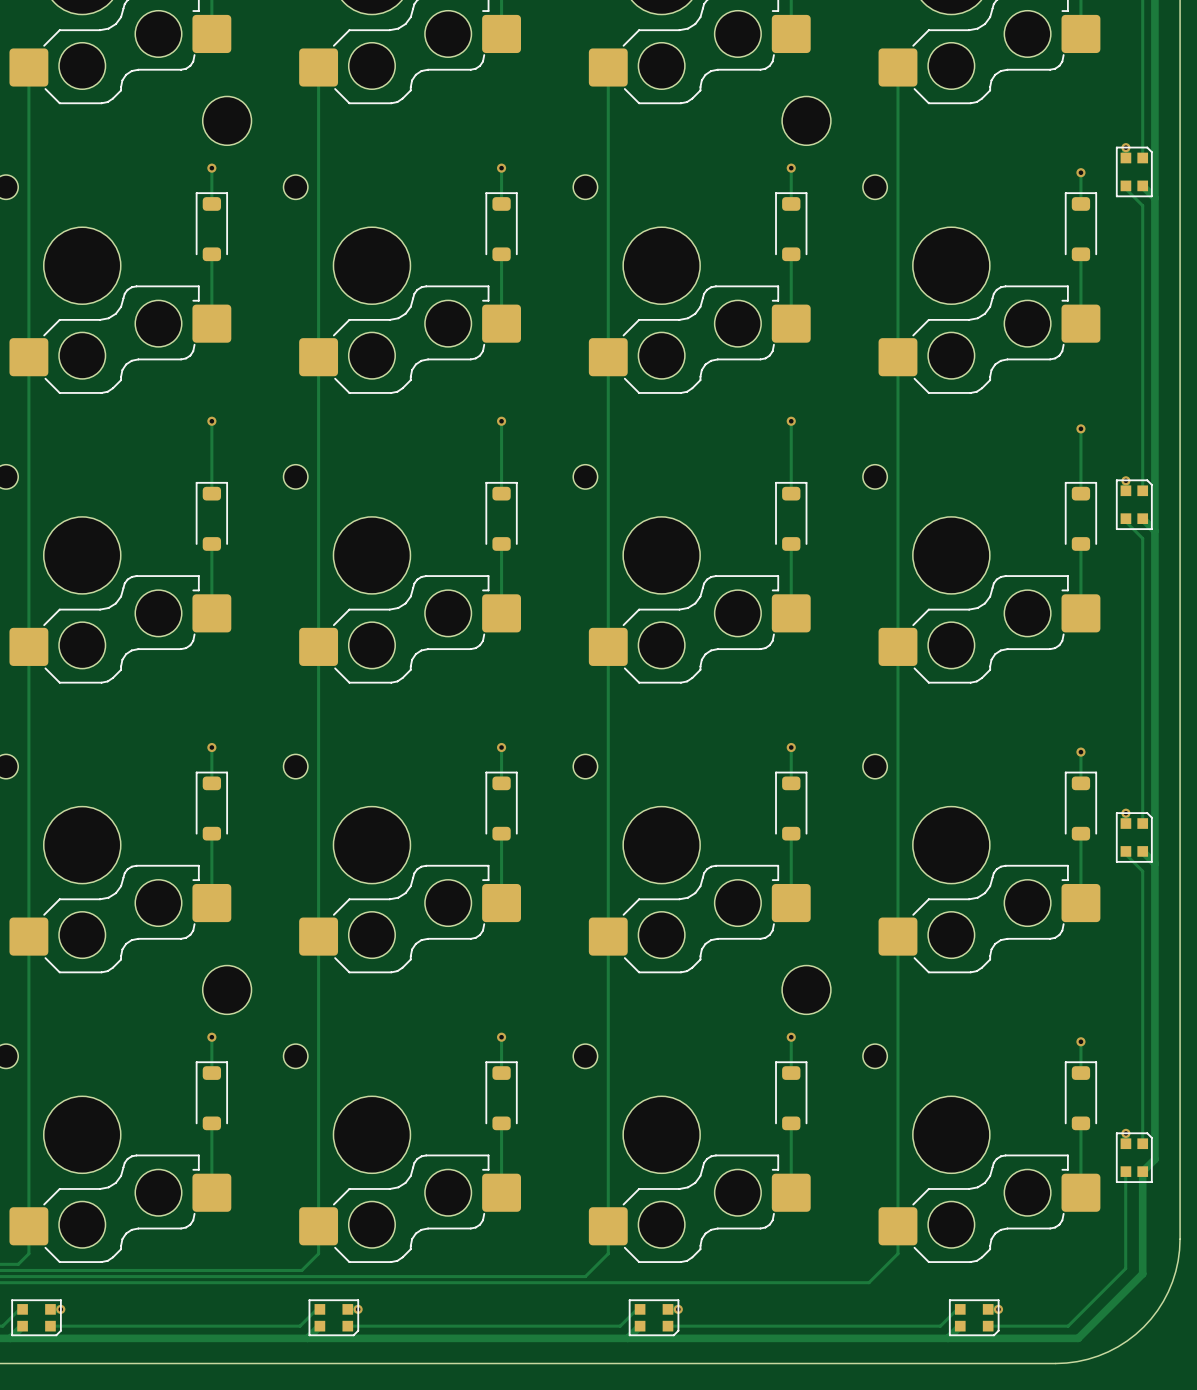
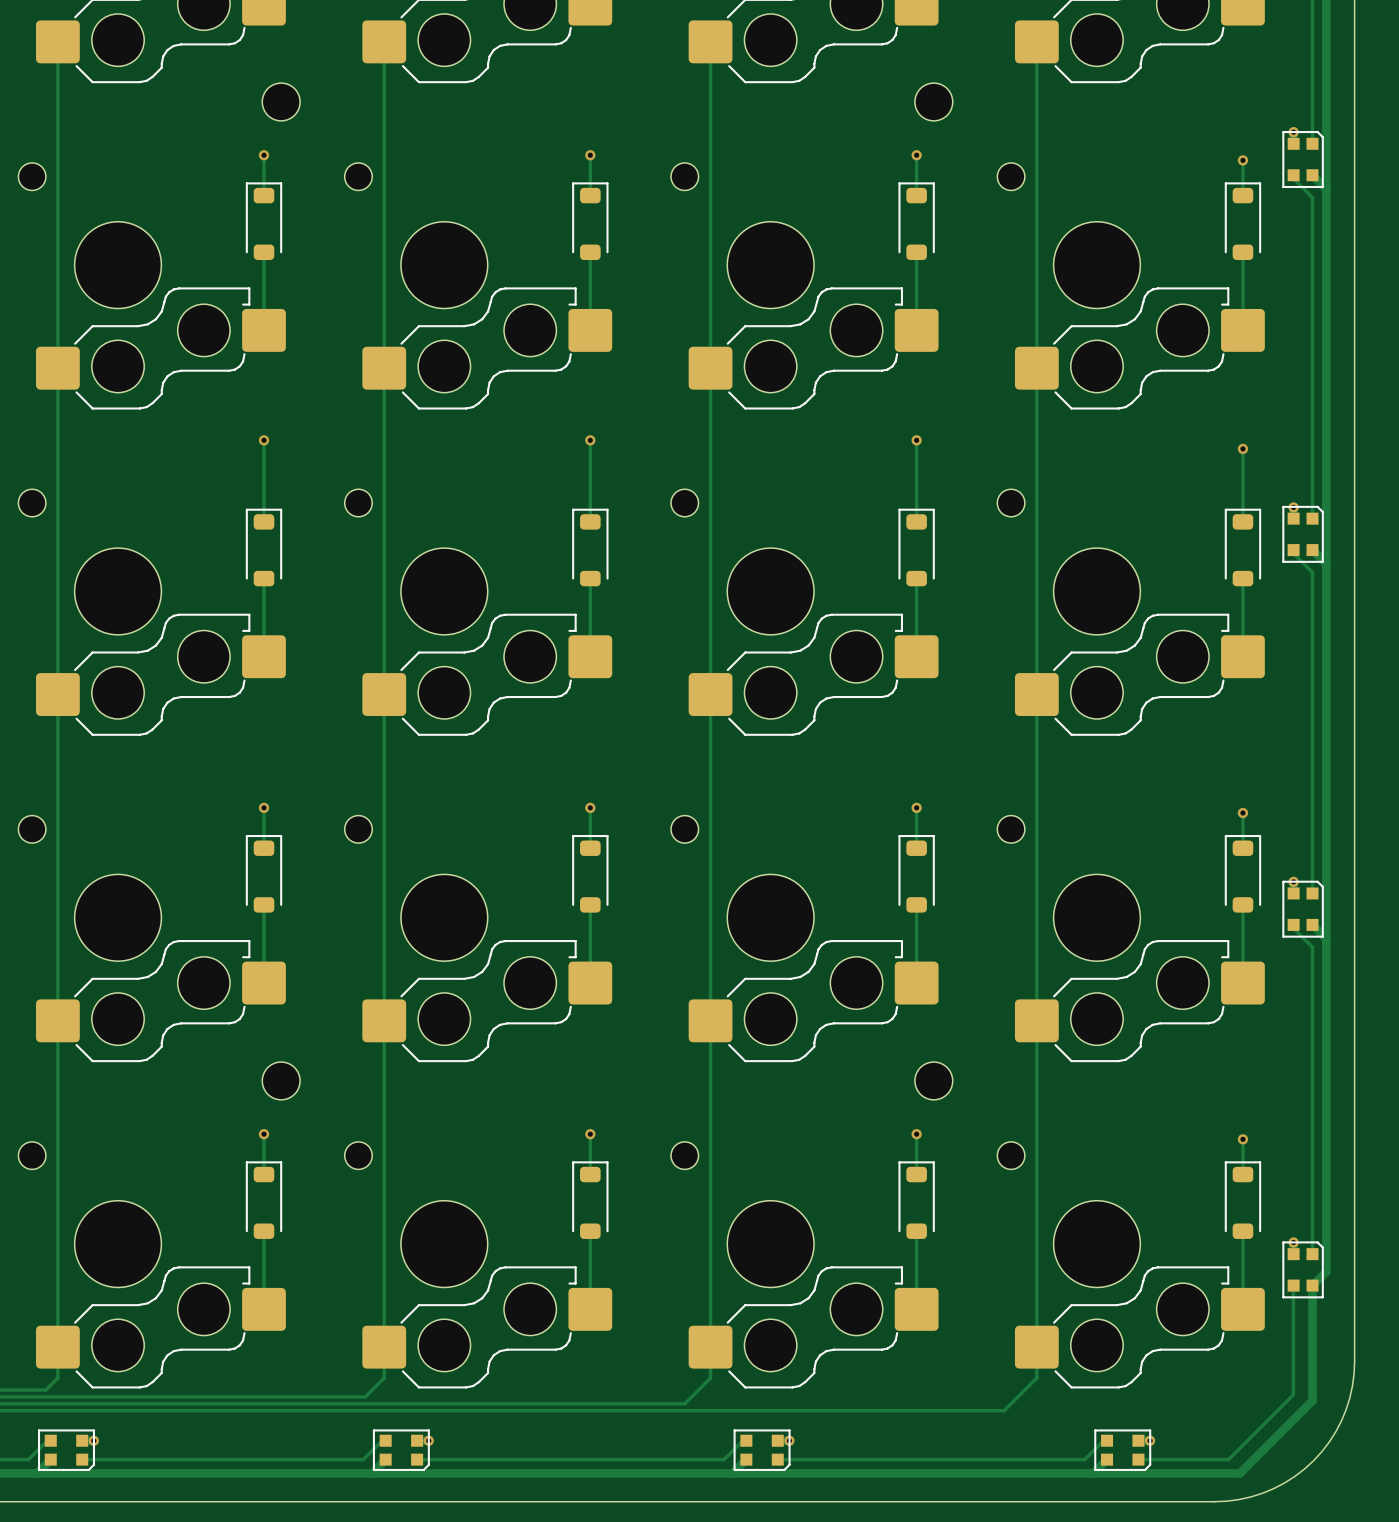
part footprint: [202, 96, 252, 146] -> [262, 83, 301, 121]
part footprint: [782, 96, 831, 146] -> [914, 83, 953, 121]
part footprint: [202, 965, 252, 1015] -> [262, 1062, 301, 1100]
part footprint: [782, 965, 831, 1015] -> [914, 1062, 953, 1100]

